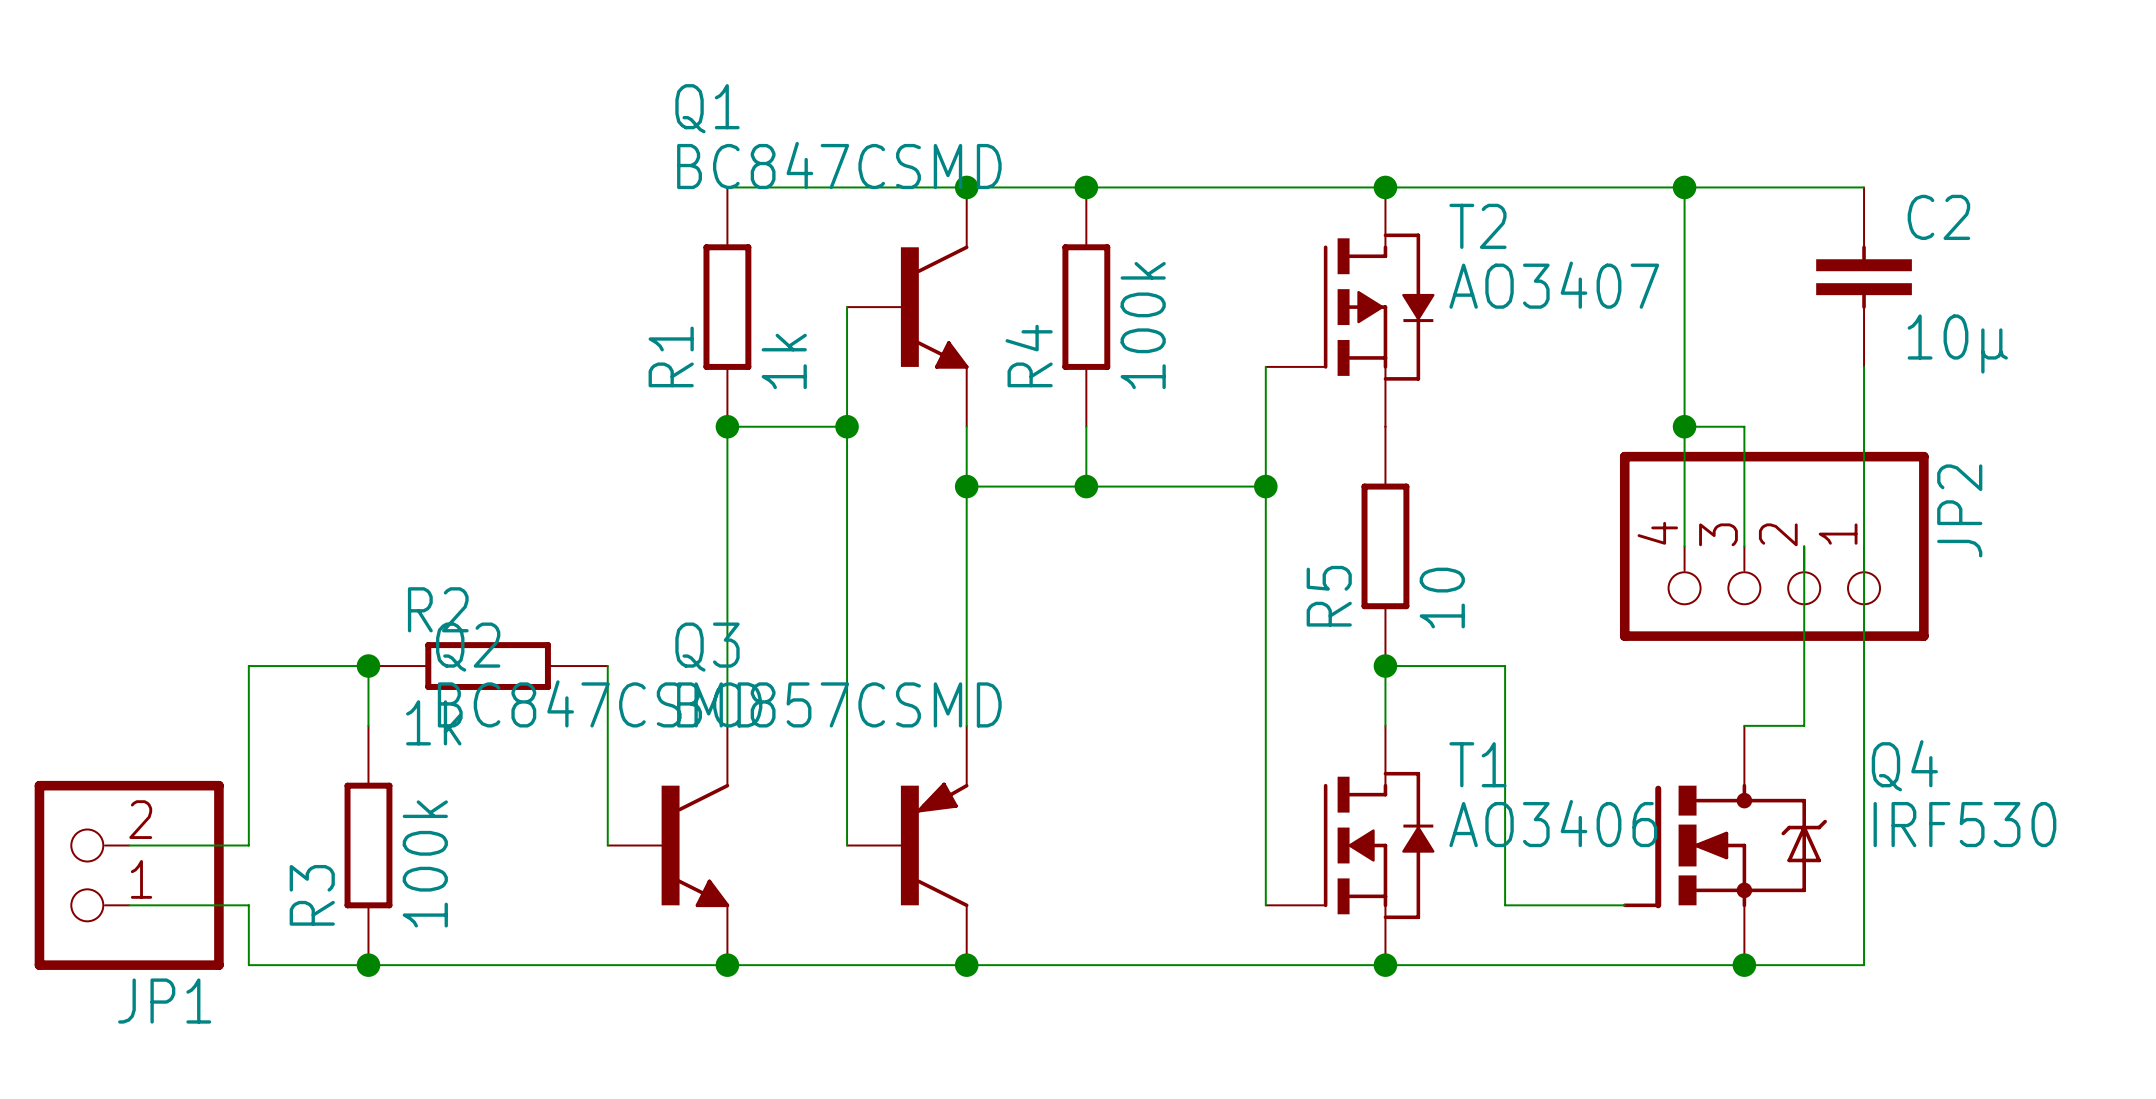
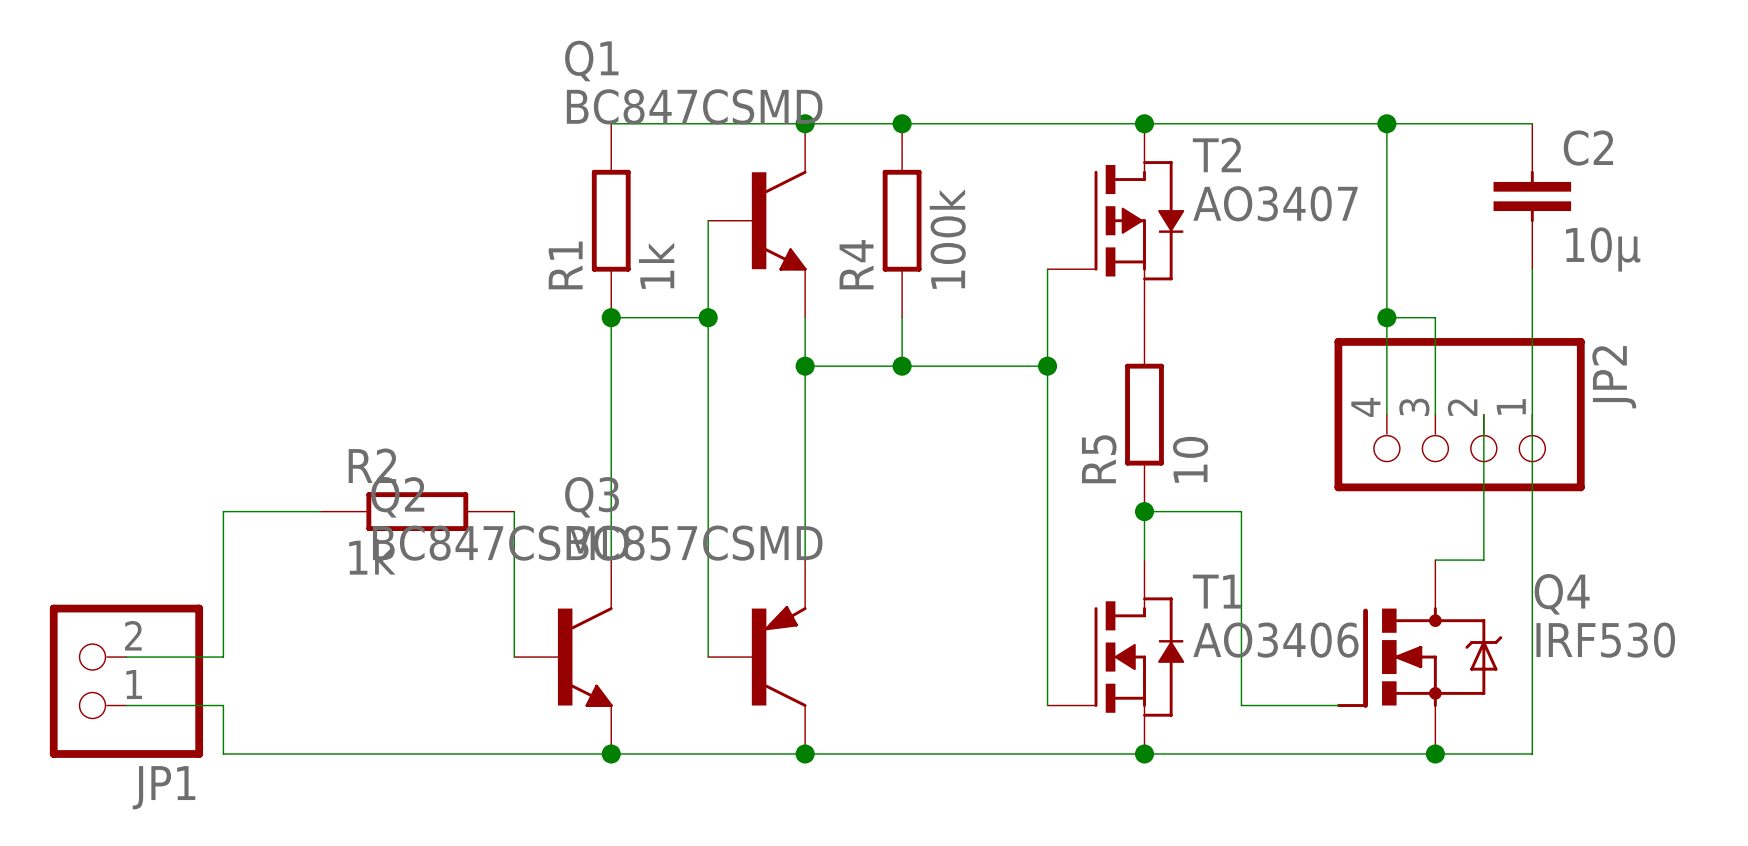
wire: (368, 666) (368, 725) -> none
junction: (368, 666) -> none
R3: 100k (368, 845) -> none
junction: (368, 965) -> none

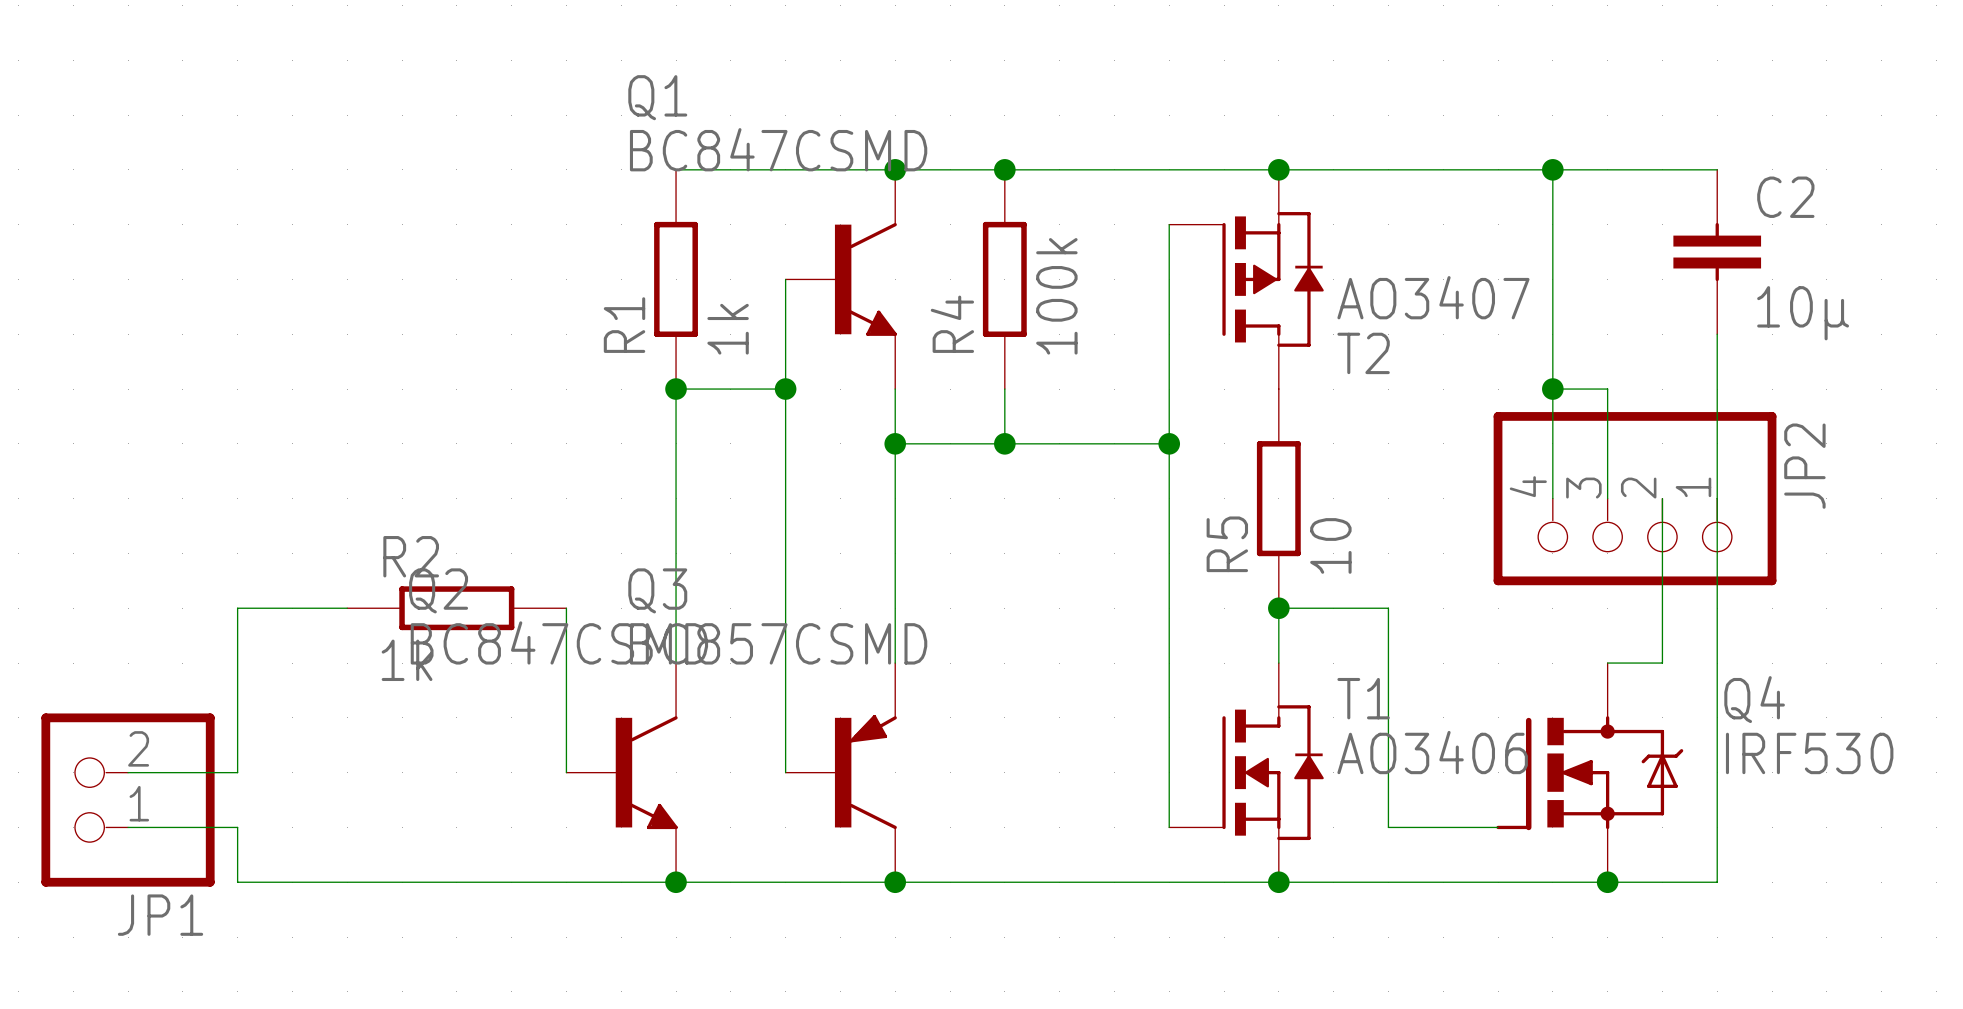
wire: none -> (1169, 224) (1169, 334)
T2 flip: as is (1139, 220) -> up-down (1273, 279)

